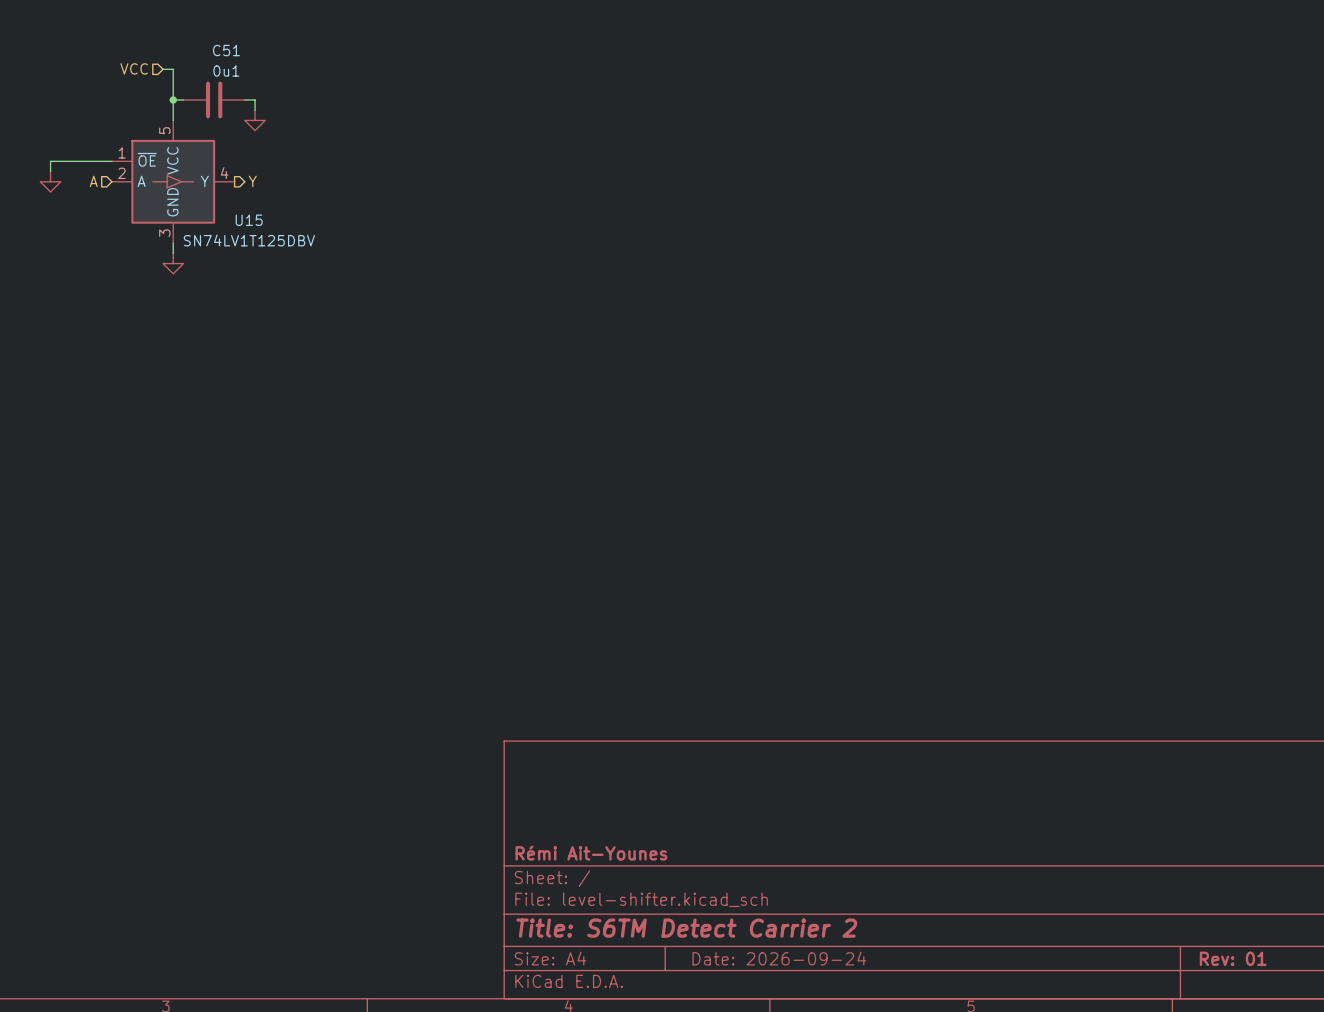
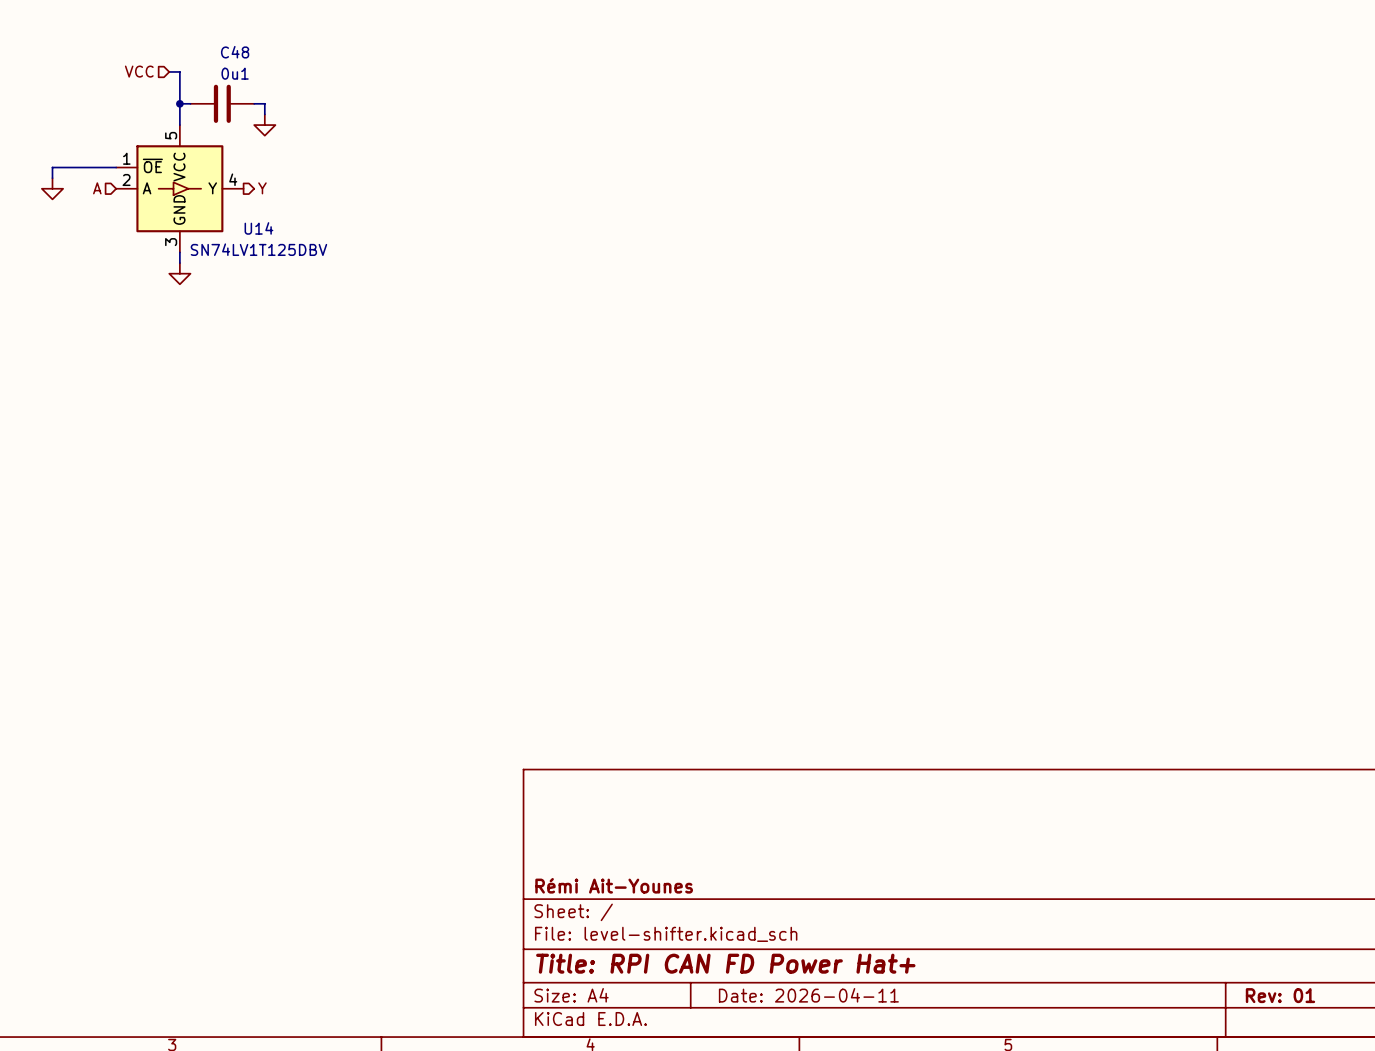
C51 name: C51 (226, 50) -> C48 (235, 52)
U15 name: U15 (249, 220) -> U14 (258, 228)
title block: Title: S6TM Detect Carrier 2 (686, 928) -> Title: RPI CAN FD Power Hat+ (725, 963)
title block: Date: 2026-09-24 (779, 958) -> Date: 2026-04-11 (808, 995)

